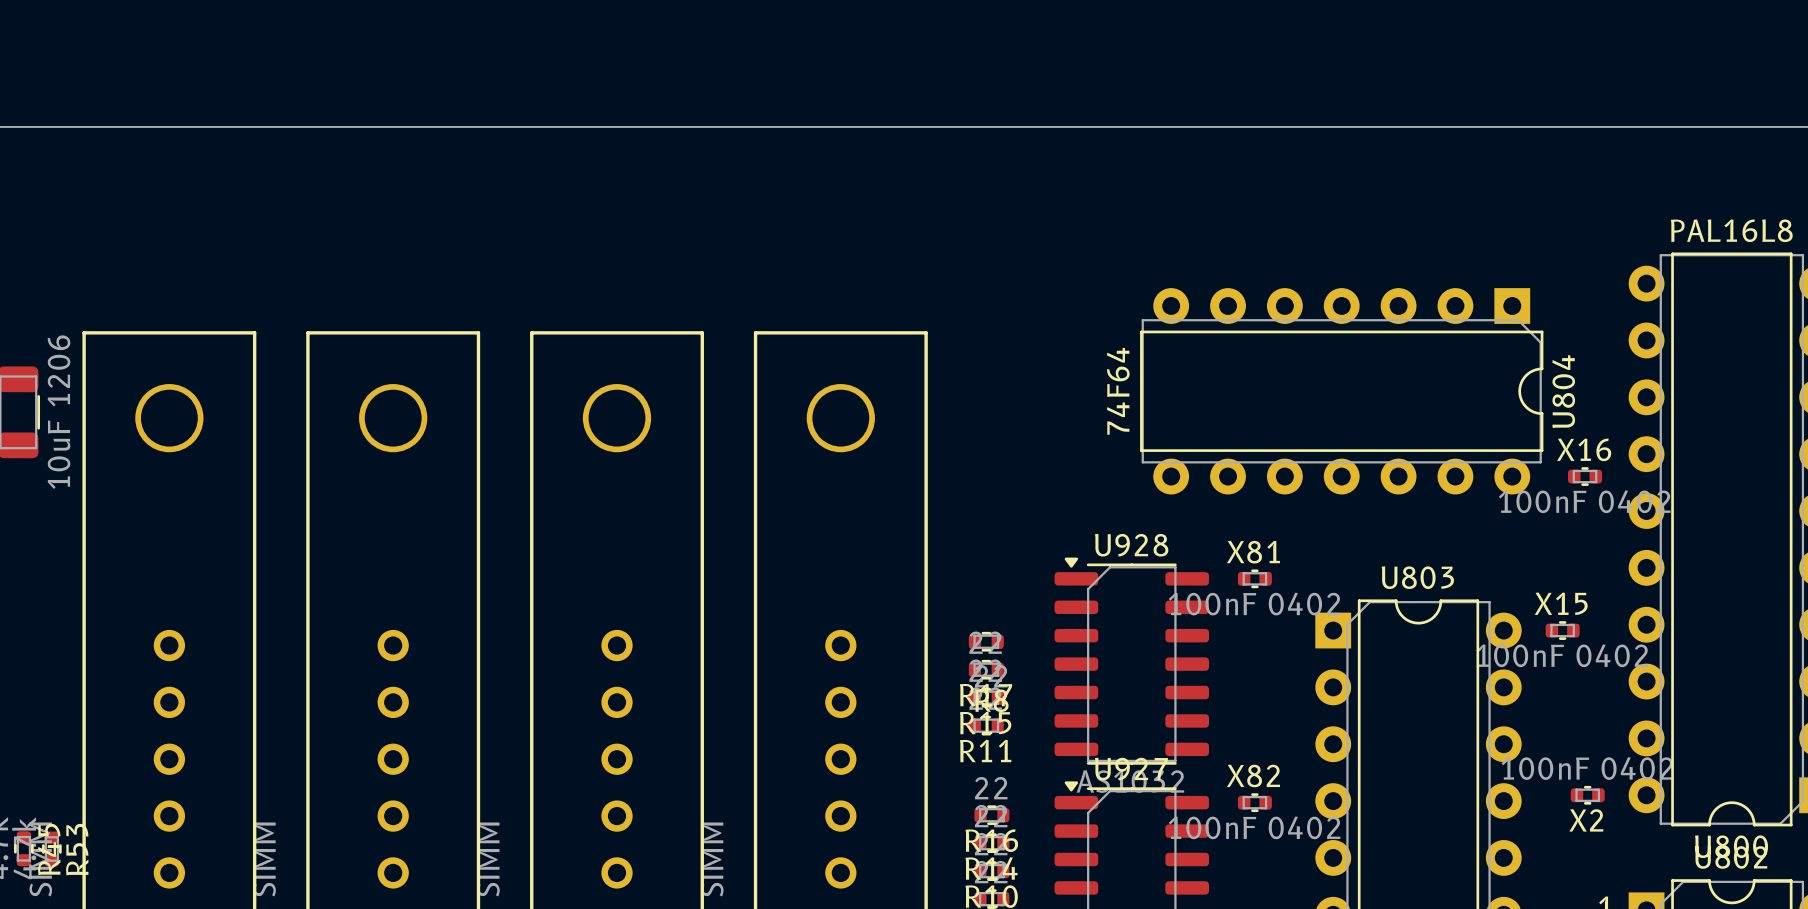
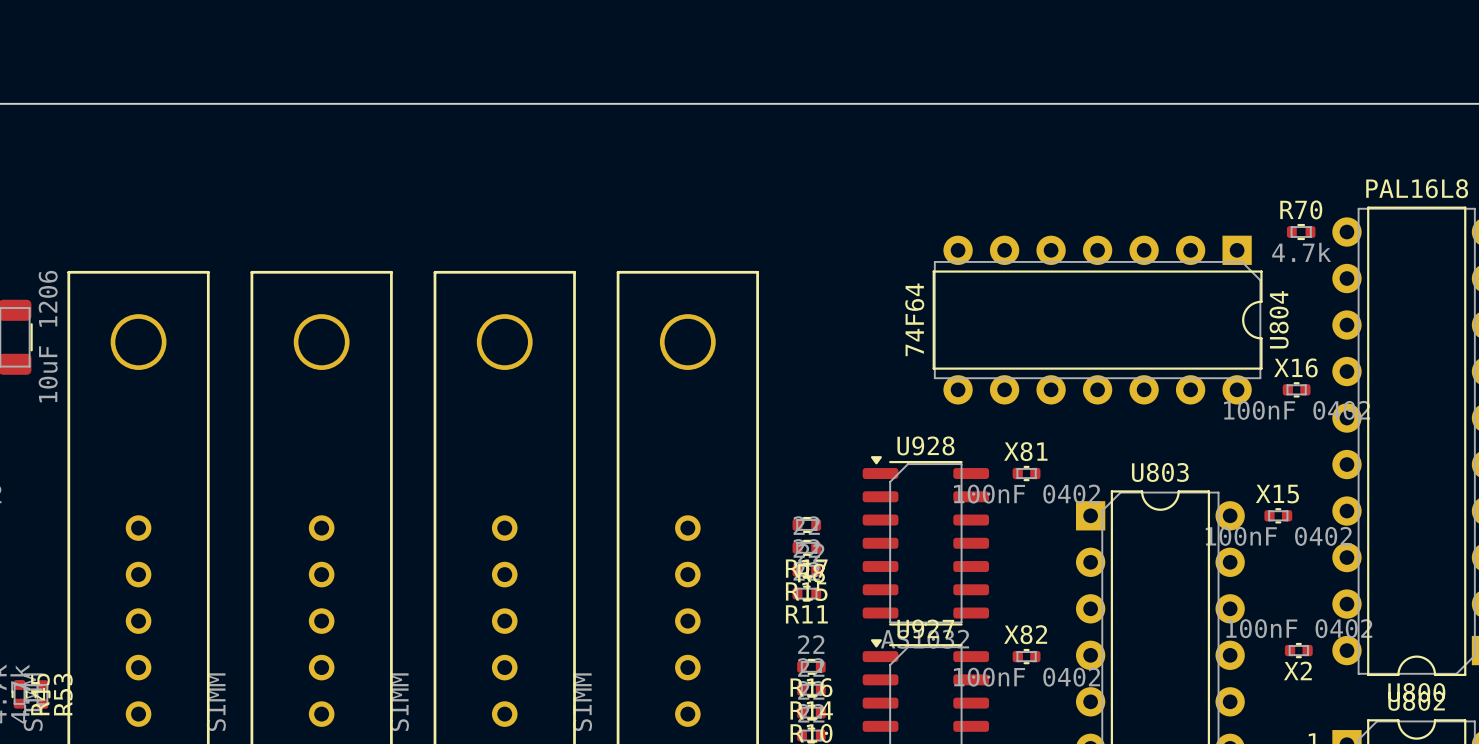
R70: none -> 4.7k (1301, 232)

